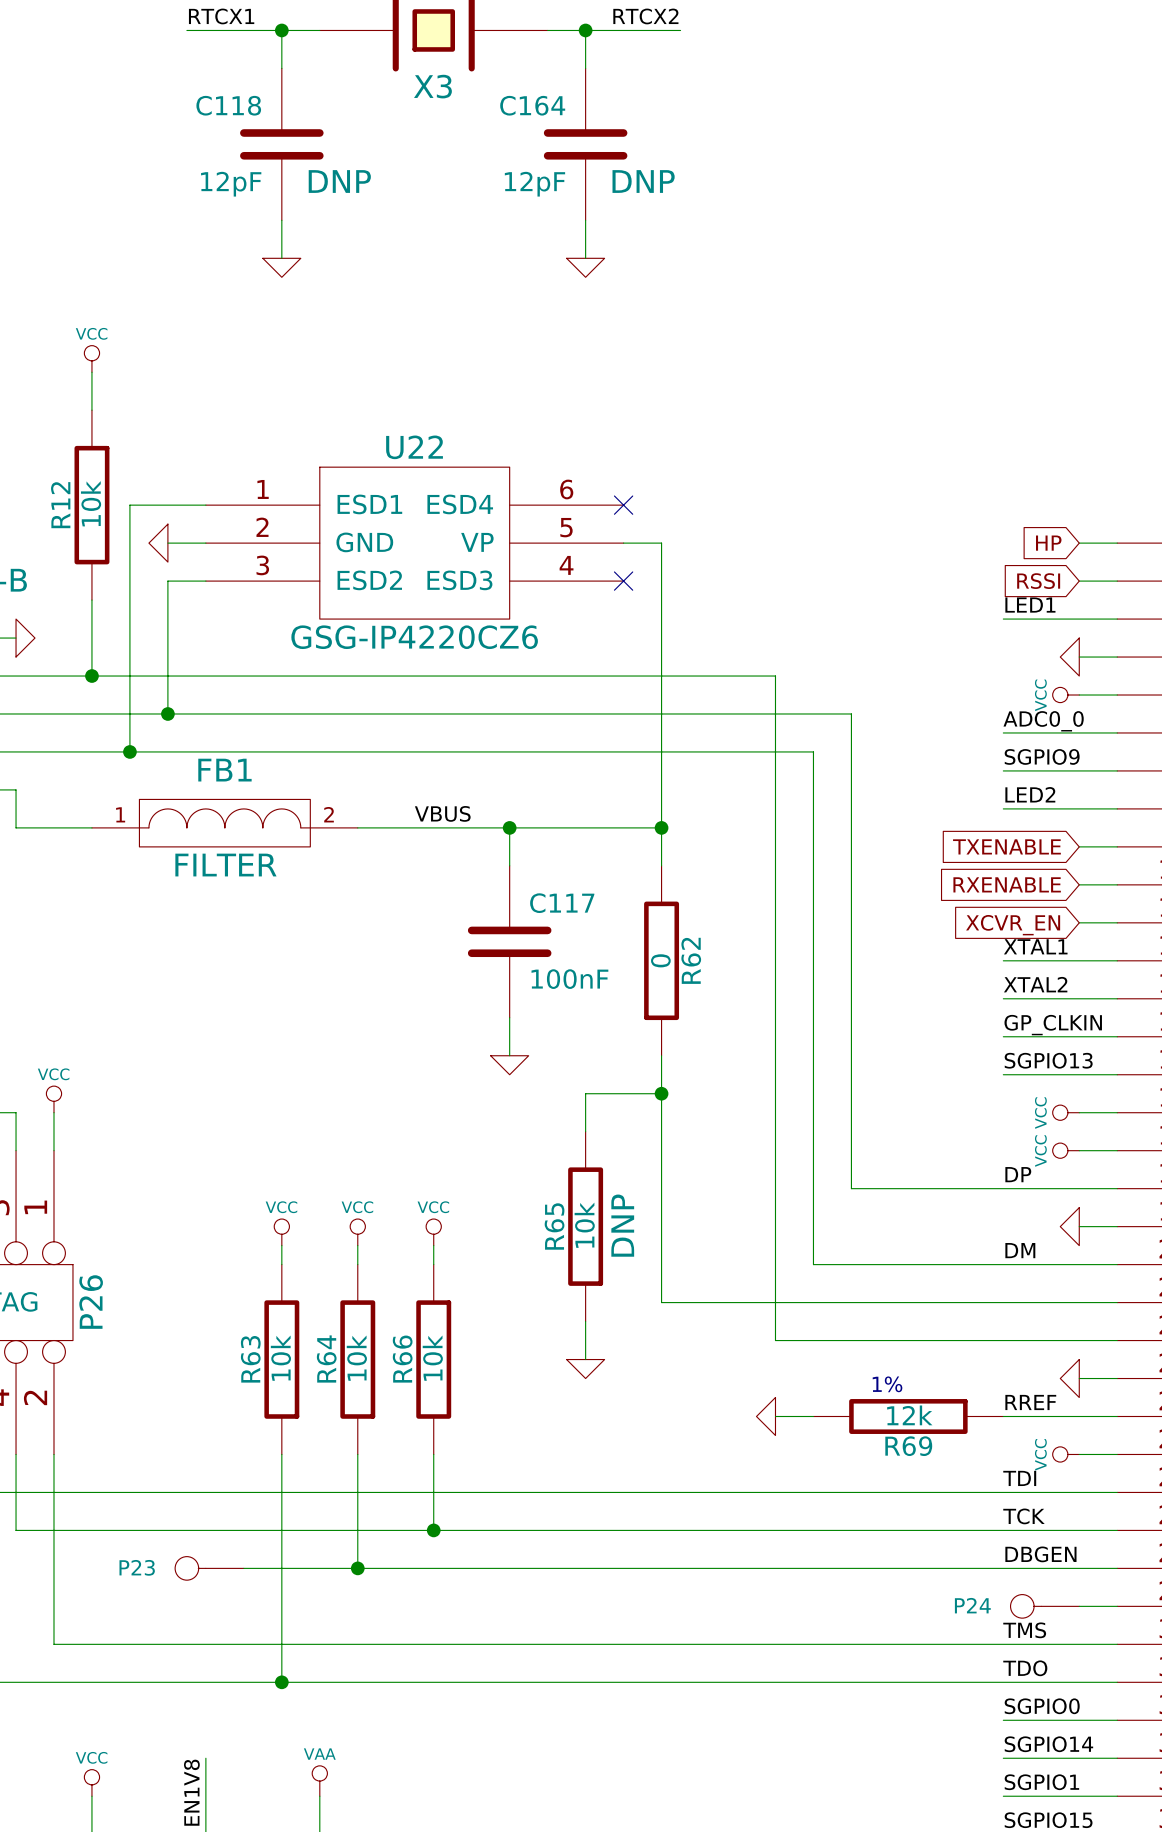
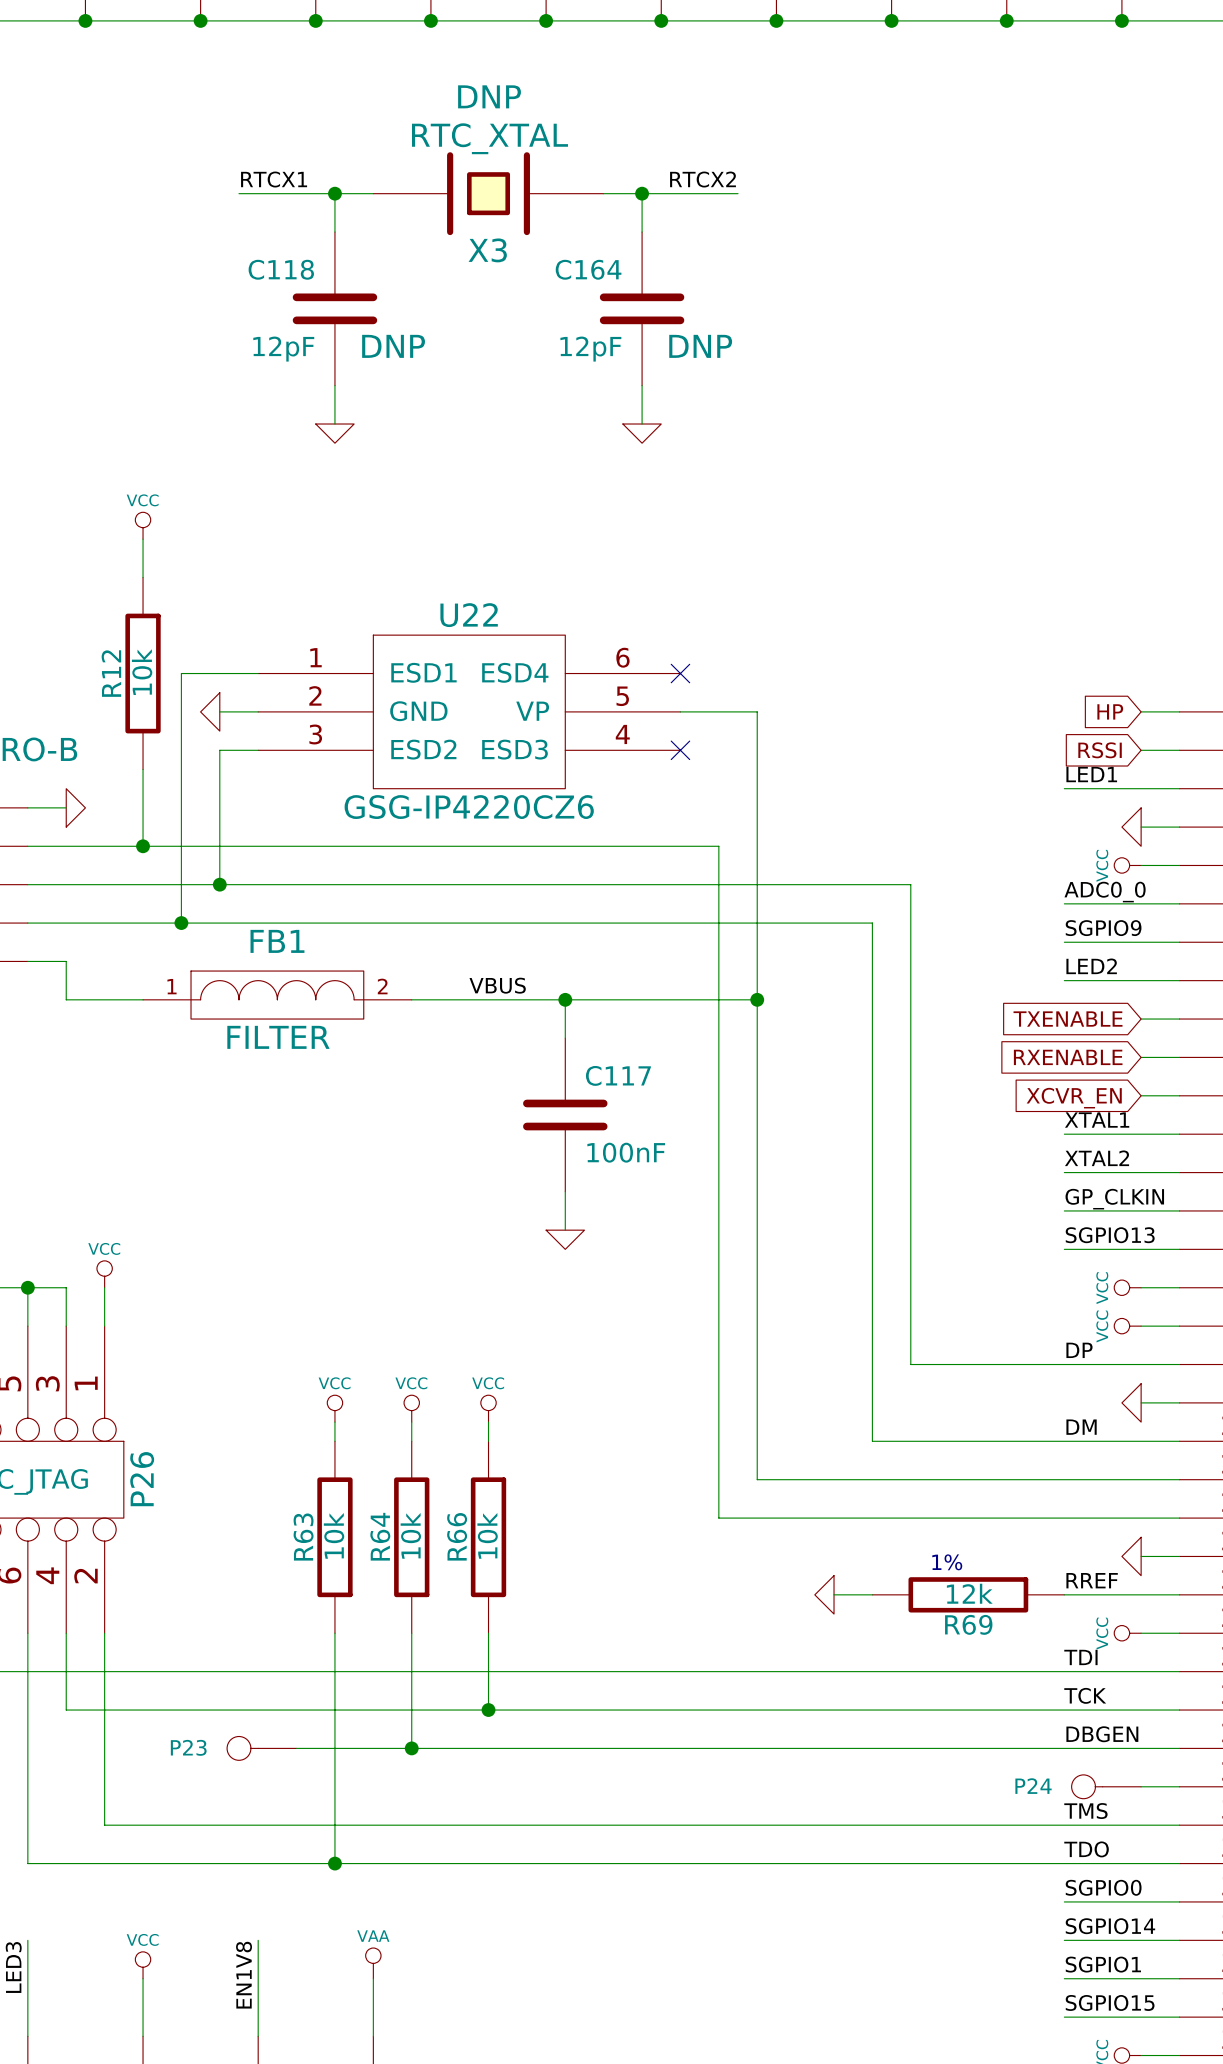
wire: (661, 543) (661, 676) (775, 676) (775, 1340) -> (718, 711) (757, 711) (757, 1479)
wire: none -> (718, 999) (757, 999)
junction position: (661, 827) -> (757, 999)
wire: none -> (718, 1038) (718, 1230)
R62: 0 (661, 960) -> none
wire: (661, 1093) (585, 1093) (585, 1131) -> none
junction: (661, 1093) -> none
R65: 10k (585, 1226) -> none
wire: (661, 1302) (699, 1302) -> (718, 1479) (718, 1518) (834, 1518)
wire: (585, 1321) (585, 1359) -> none
power symbol: (585, 1369) -> none

